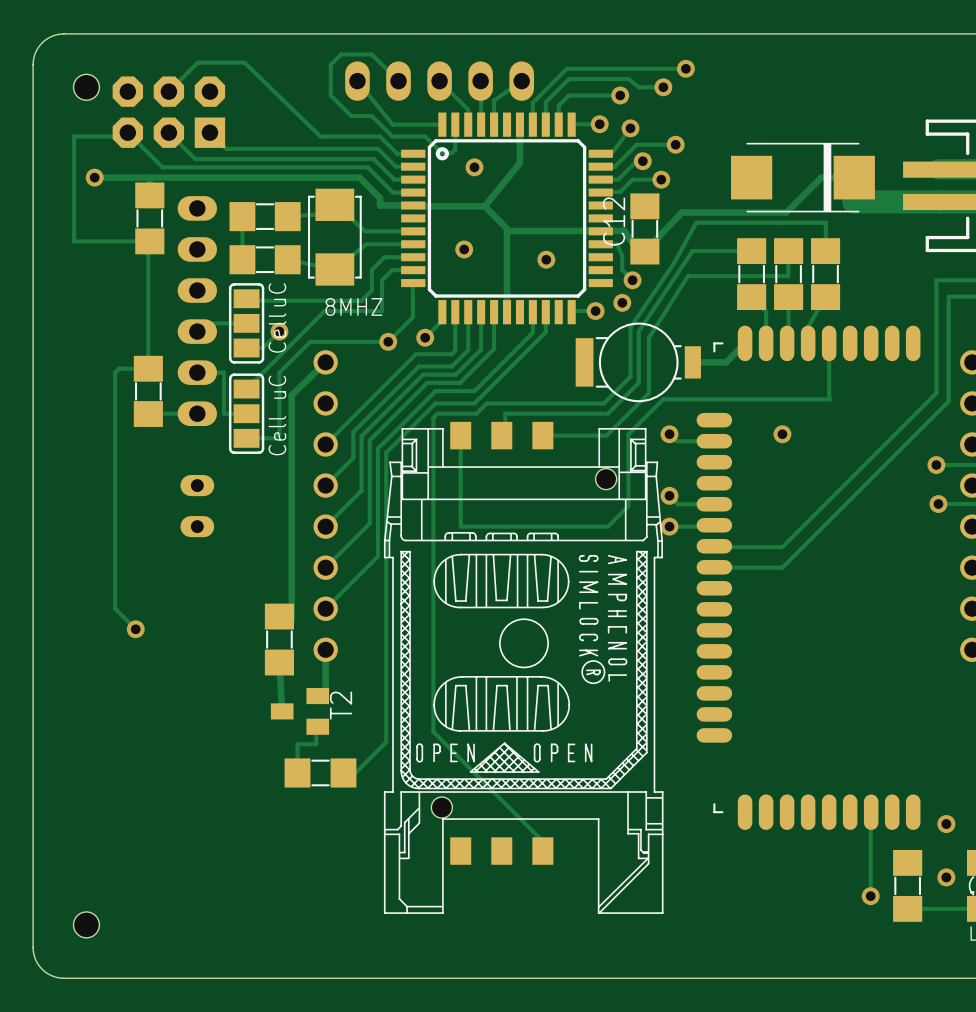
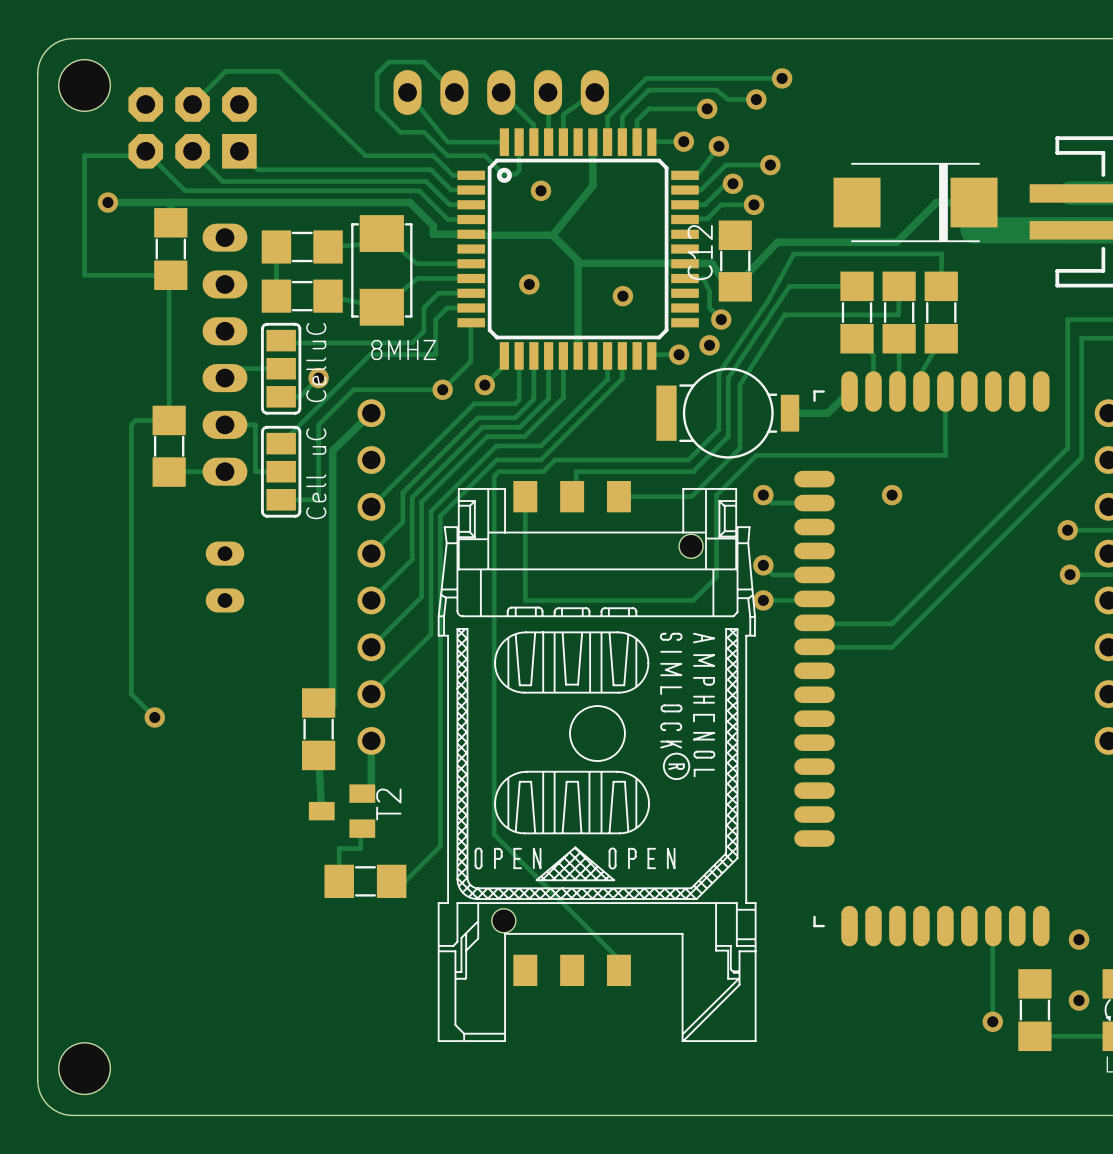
hole: none -> (84, 85)
hole: (86, 87) -> none
hole: (86, 924) -> none
hole: none -> (84, 1068)

